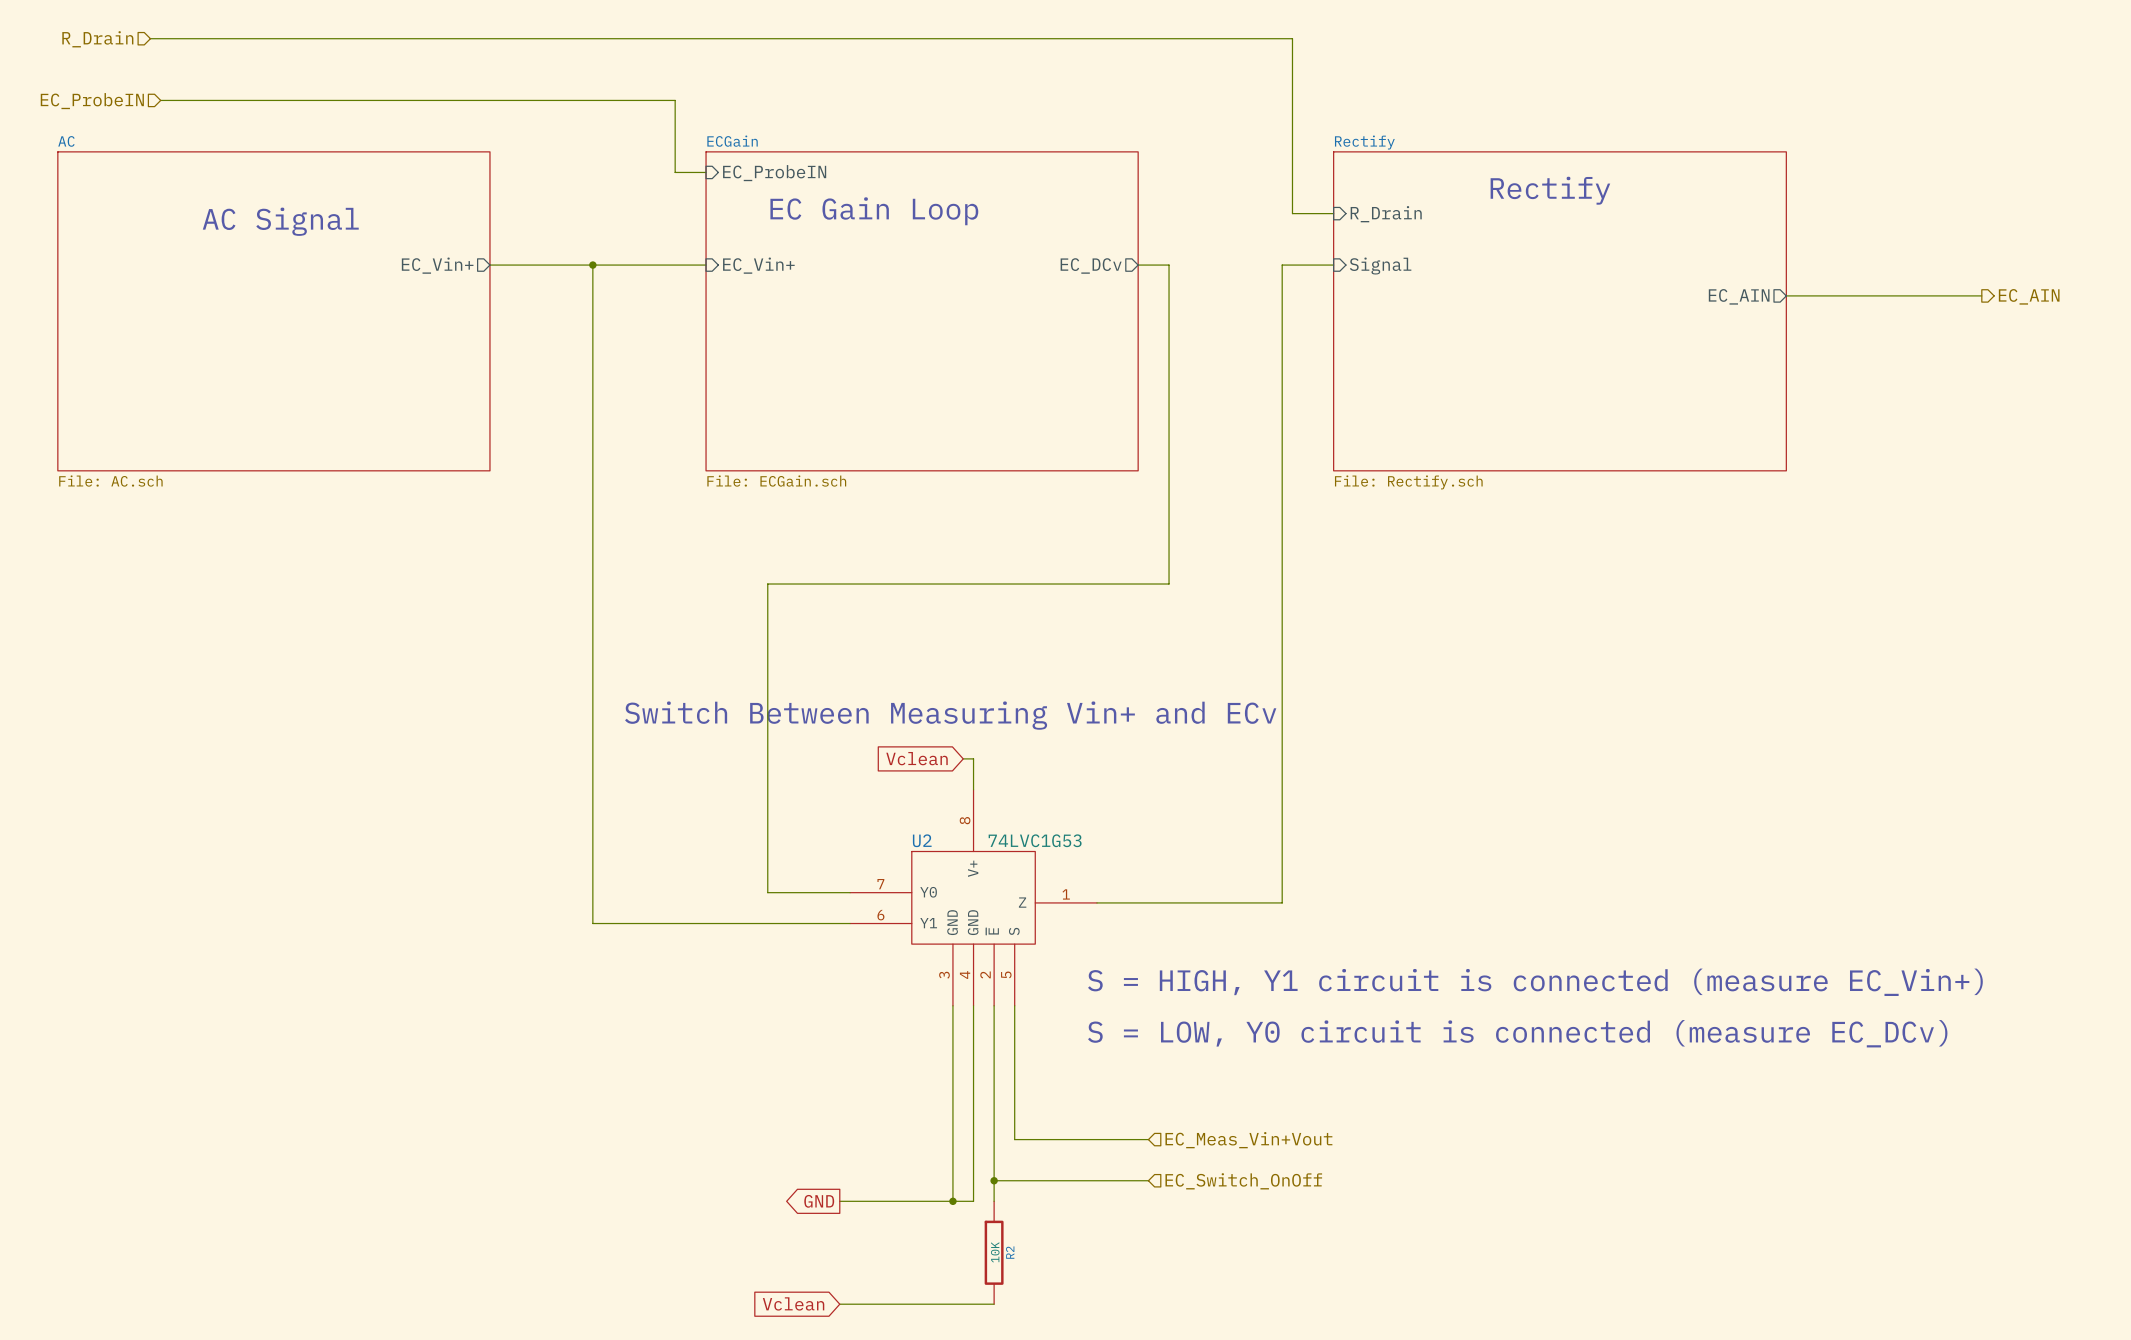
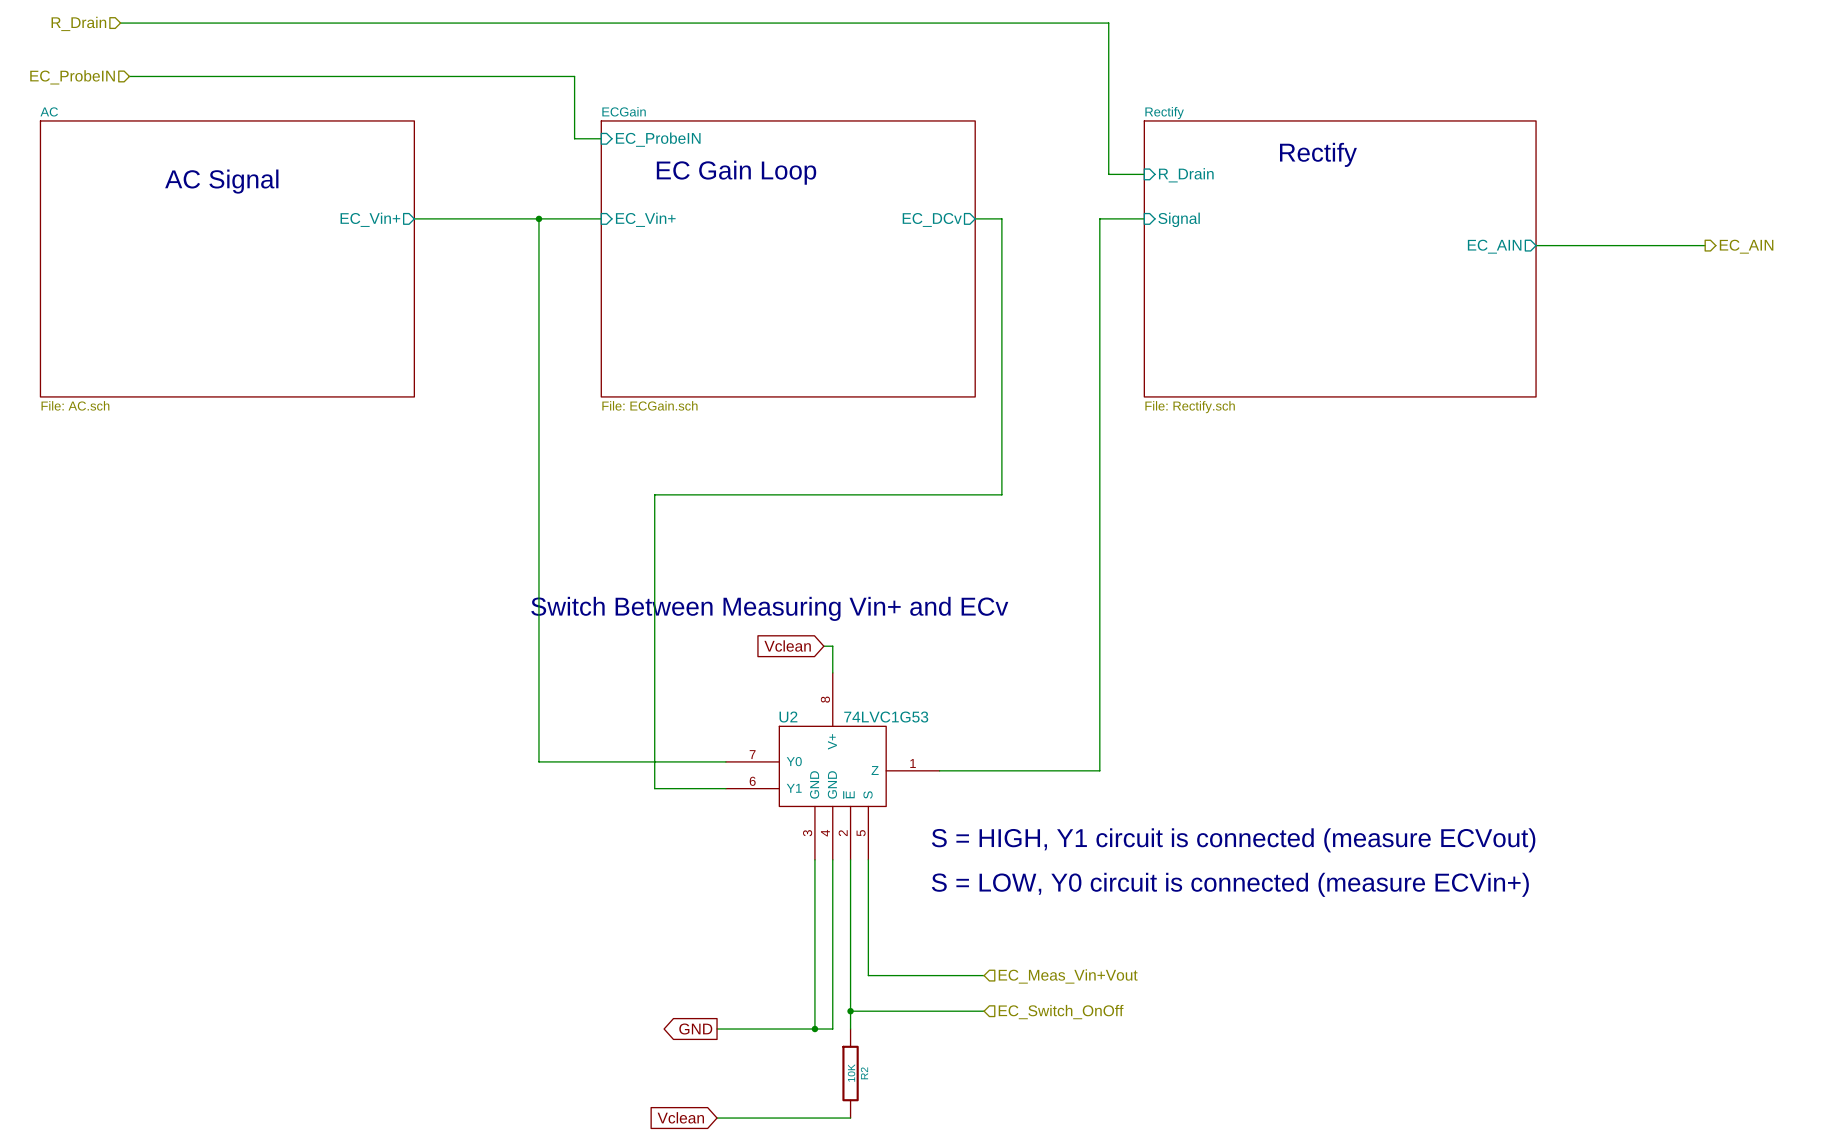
wire: (592, 265) (592, 923) (767, 923) -> (538, 218) (538, 761) (654, 761) (654, 788)
junction position: (592, 265) -> (538, 218)
text: S = HIGH, Y1 circuit is connected (measure EC_Vin+) (1535, 982) -> S = HIGH, Y1 circuit is connected (measure ECVout) (1233, 840)
text: S = LOW, Y0 circuit is connected (measure EC_DCv) (1517, 1033) -> S = LOW, Y0 circuit is connected (measure ECVin+) (1230, 884)

